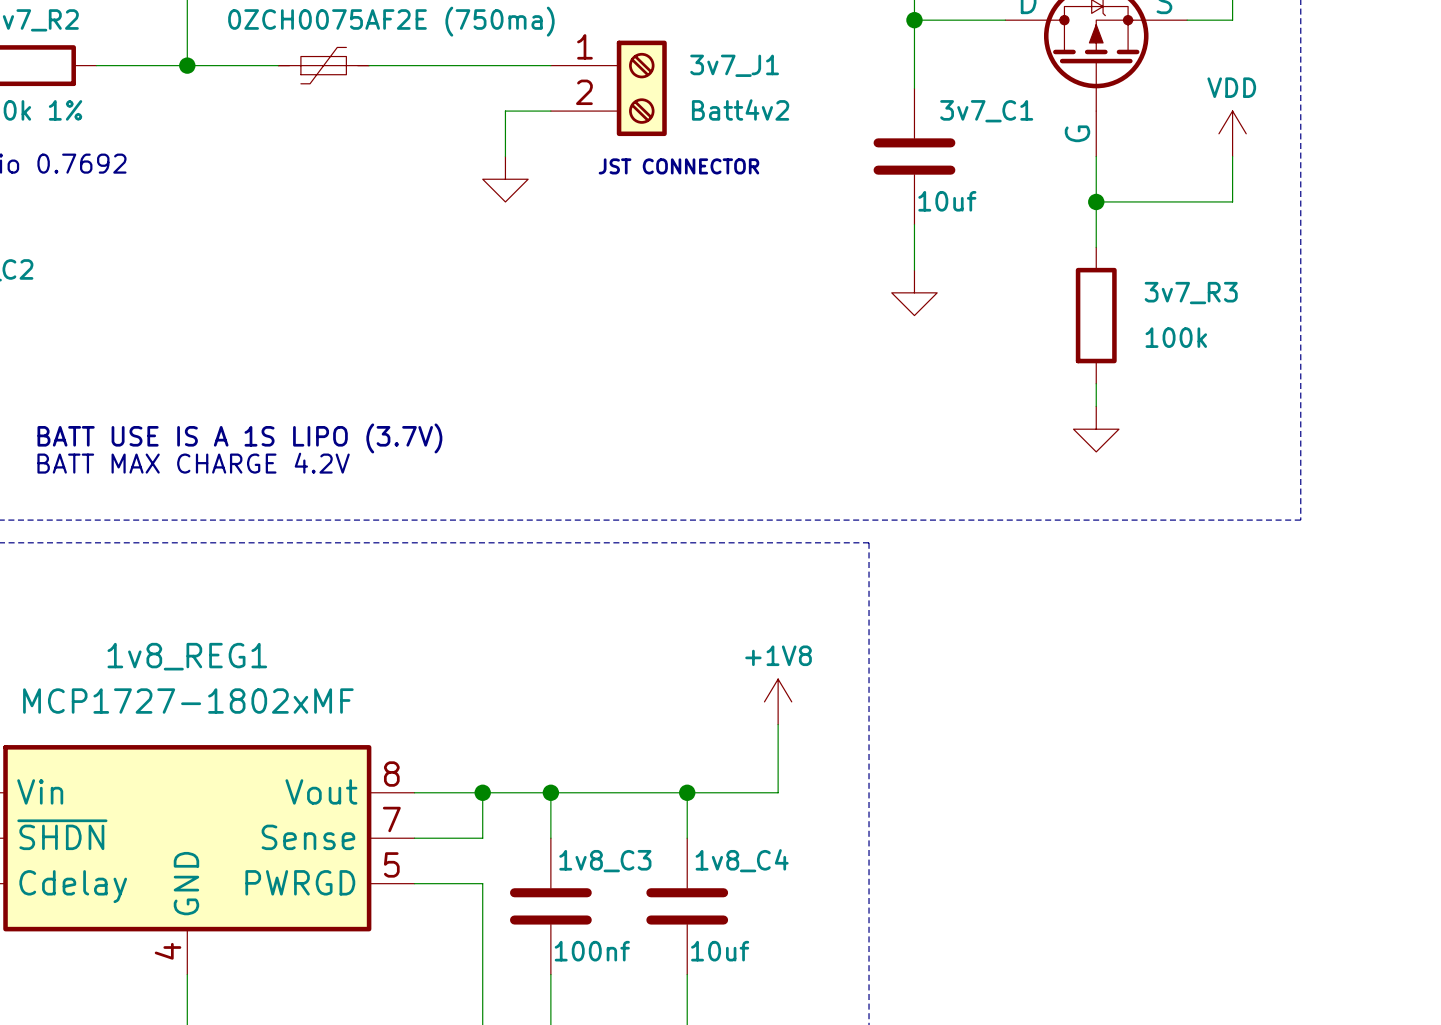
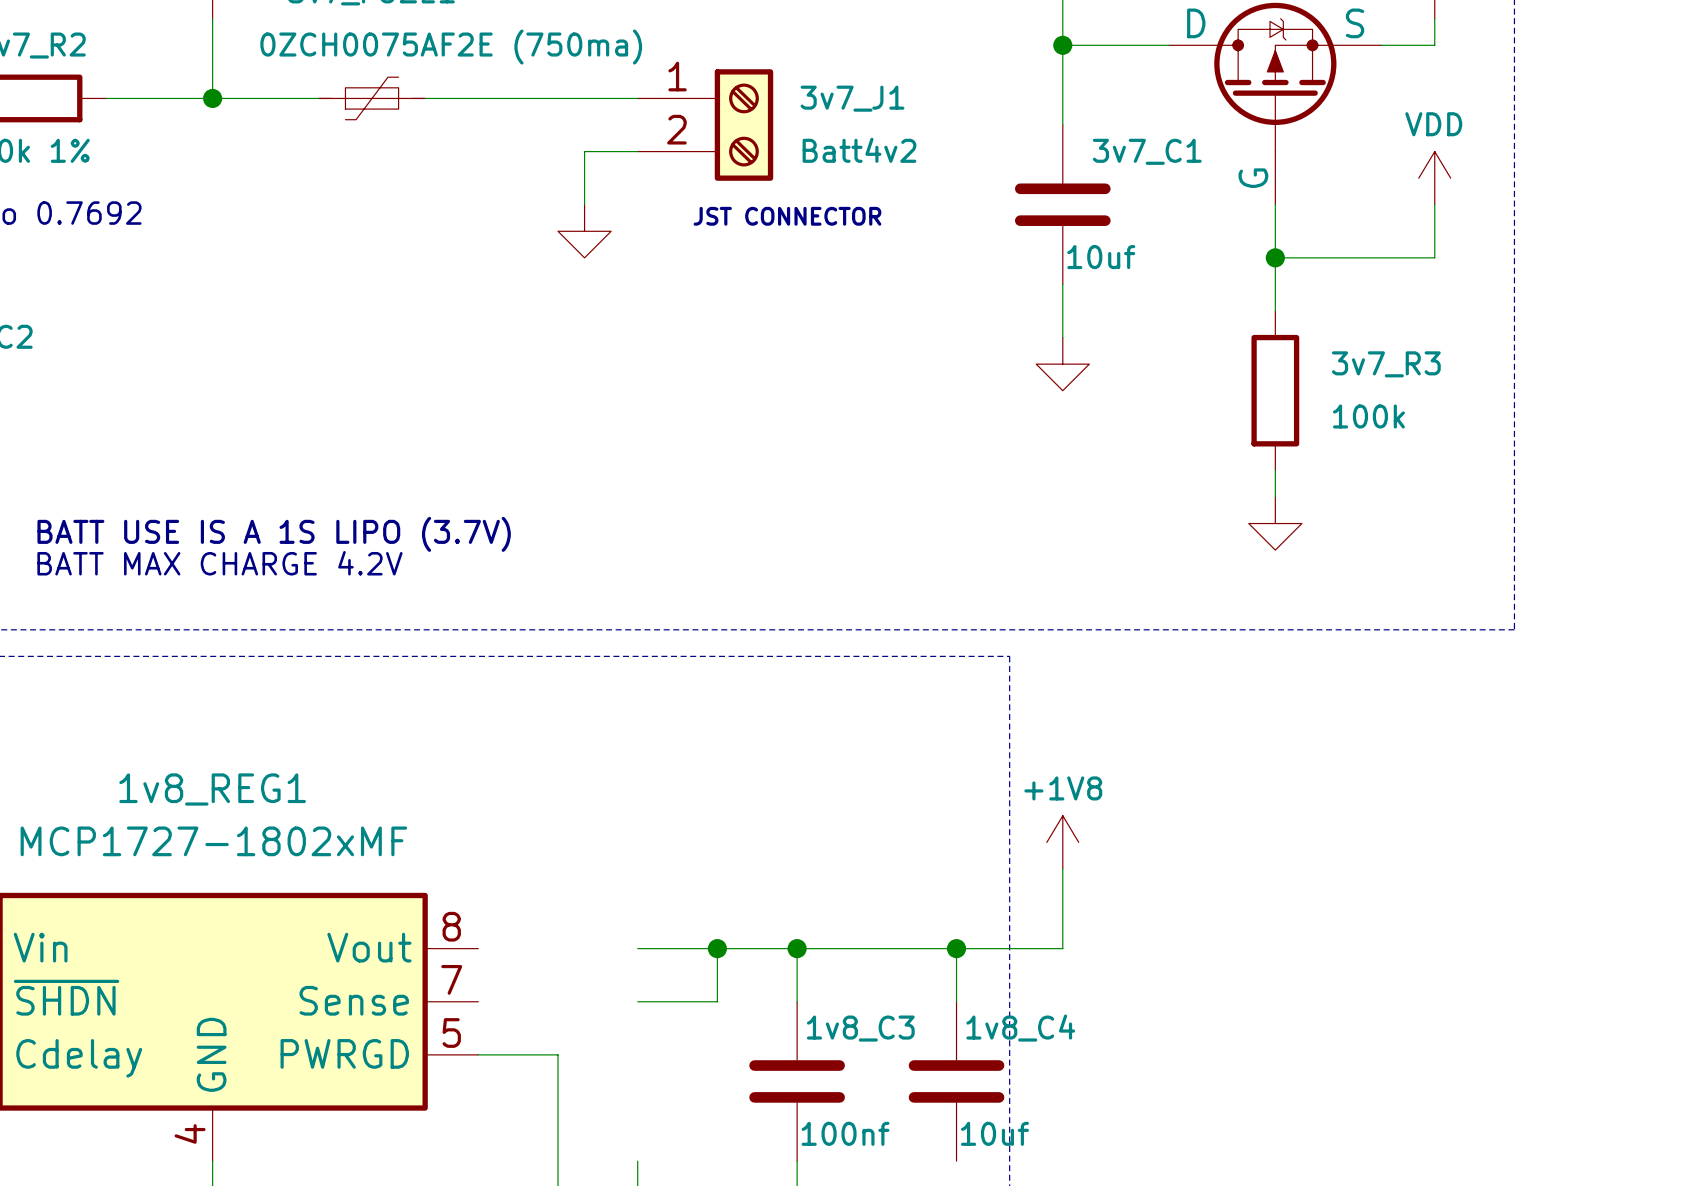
power symbol position: +1V8 (778, 701) -> +1V8 (1062, 842)
wire: (778, 724) (778, 792) -> (1062, 868) (1062, 948) (903, 948)
wire: (414, 792) (550, 792) (550, 838) -> (717, 948) (717, 1001) (637, 1001)
wire: (482, 792) (482, 838) (414, 838) -> none
junction: (482, 792) -> none
junction: (550, 792) -> none
junction: none -> (717, 948)
wire: none -> (956, 948) (956, 1001)
junction: none -> (956, 948)
1v8_C4 name: 1v8_C4 (742, 860) -> 1v8_C3 (860, 1028)
1v8_C3: 100nf (550, 906) -> none
1v8_C4: none -> 10uf (956, 1081)
1v8_C4 value: 10uf (720, 951) -> 100nf (845, 1133)

